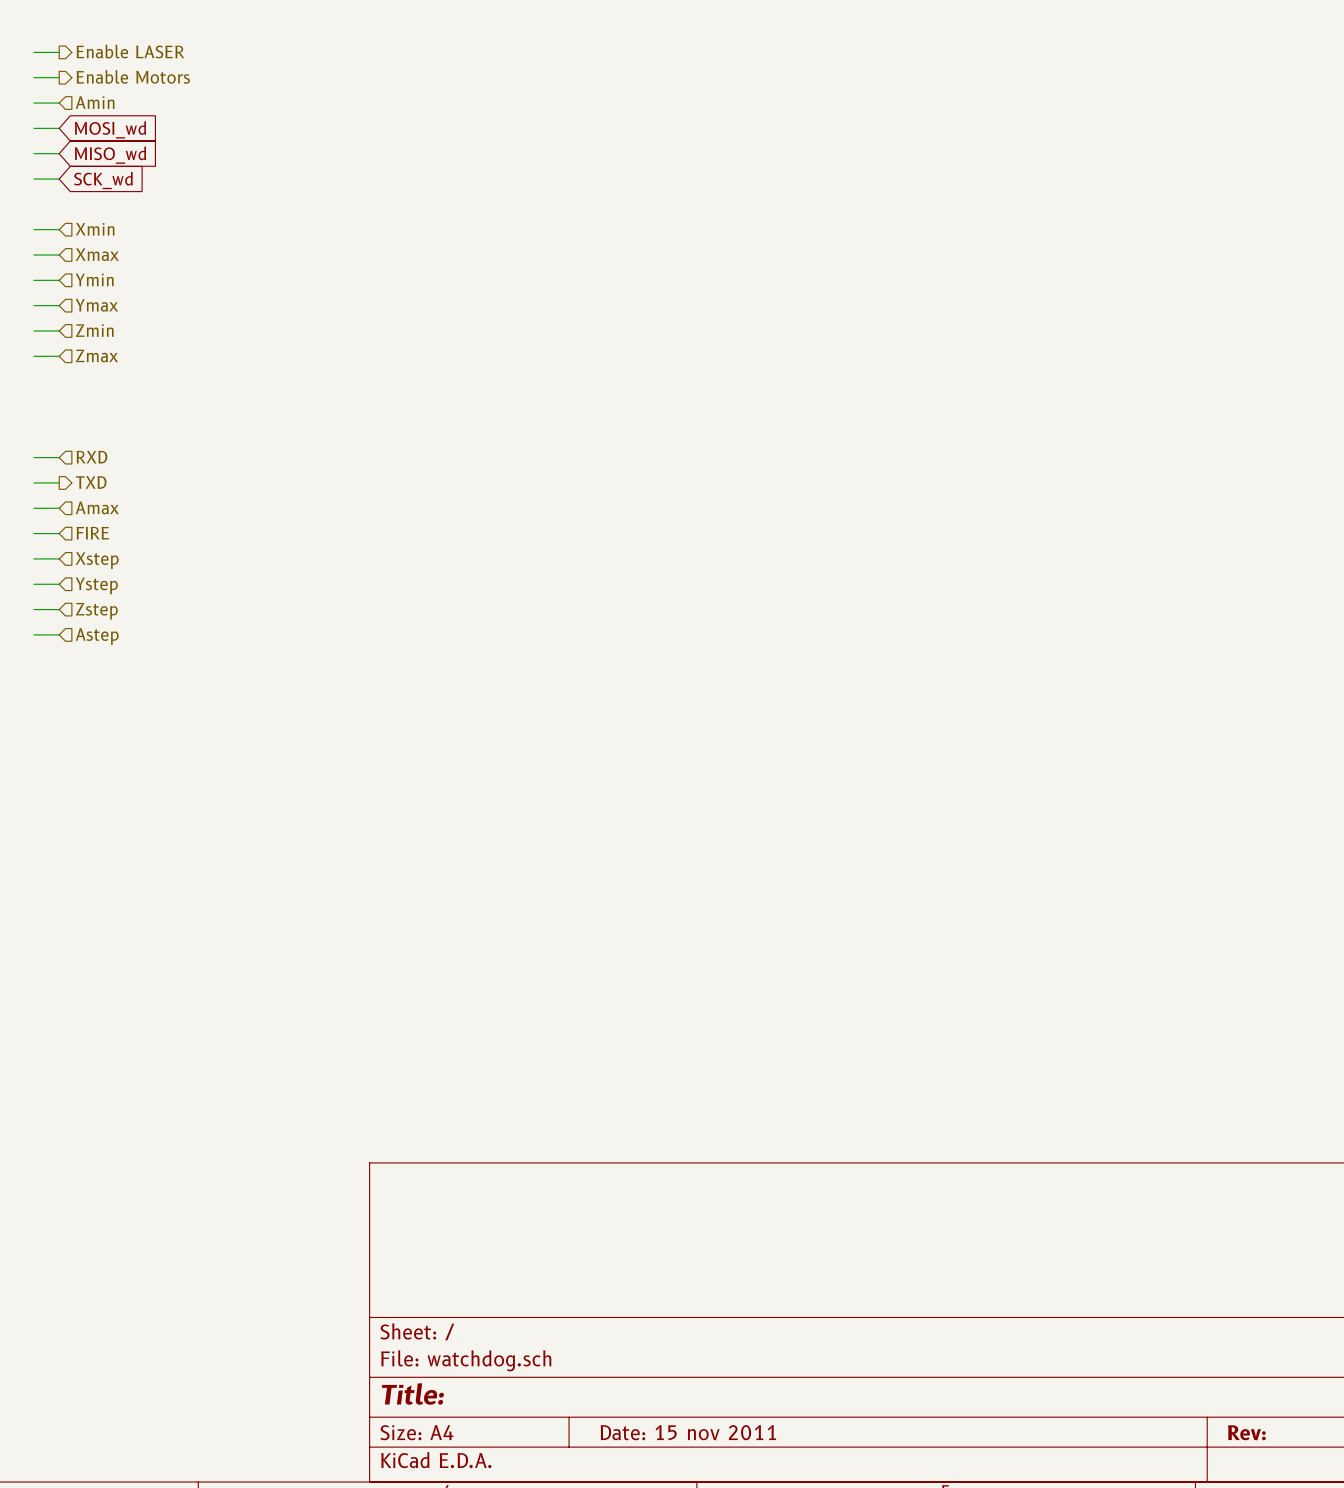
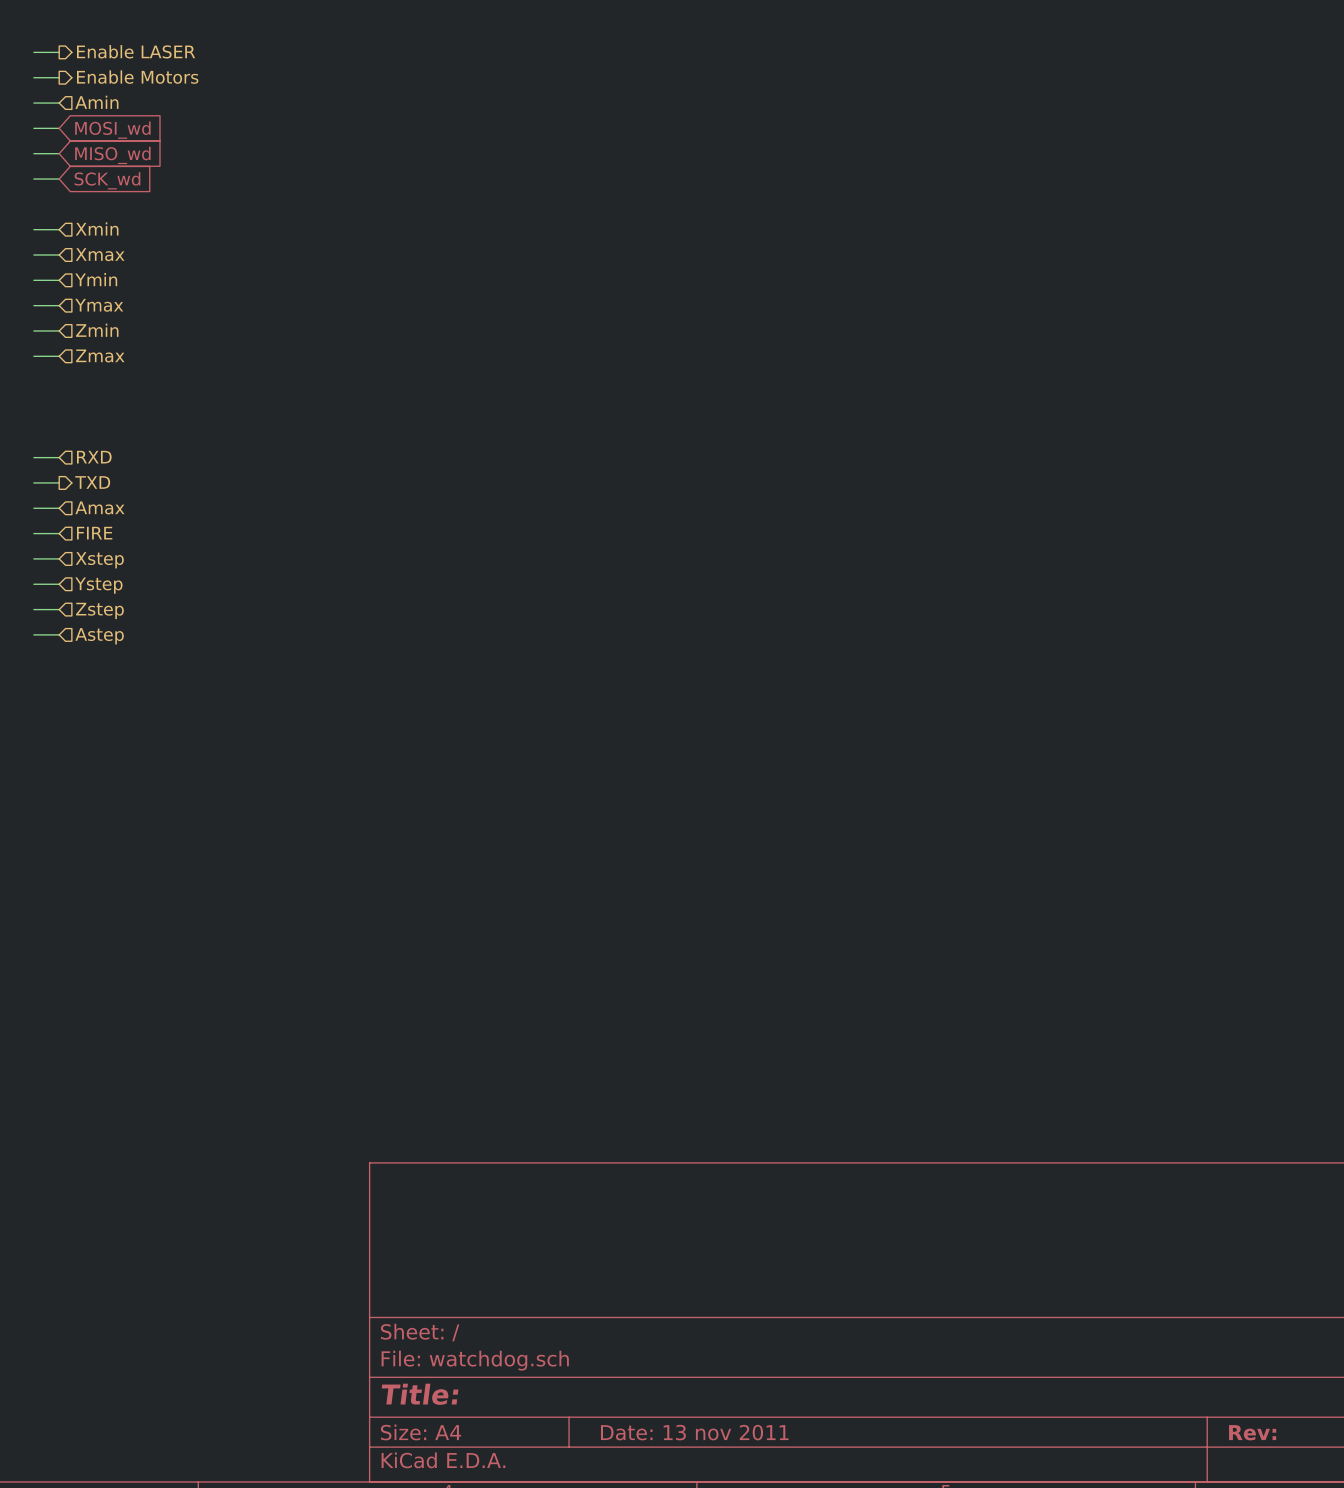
title block: Date: 15 nov 2011 (688, 1432) -> Date: 13 nov 2011 (694, 1432)

